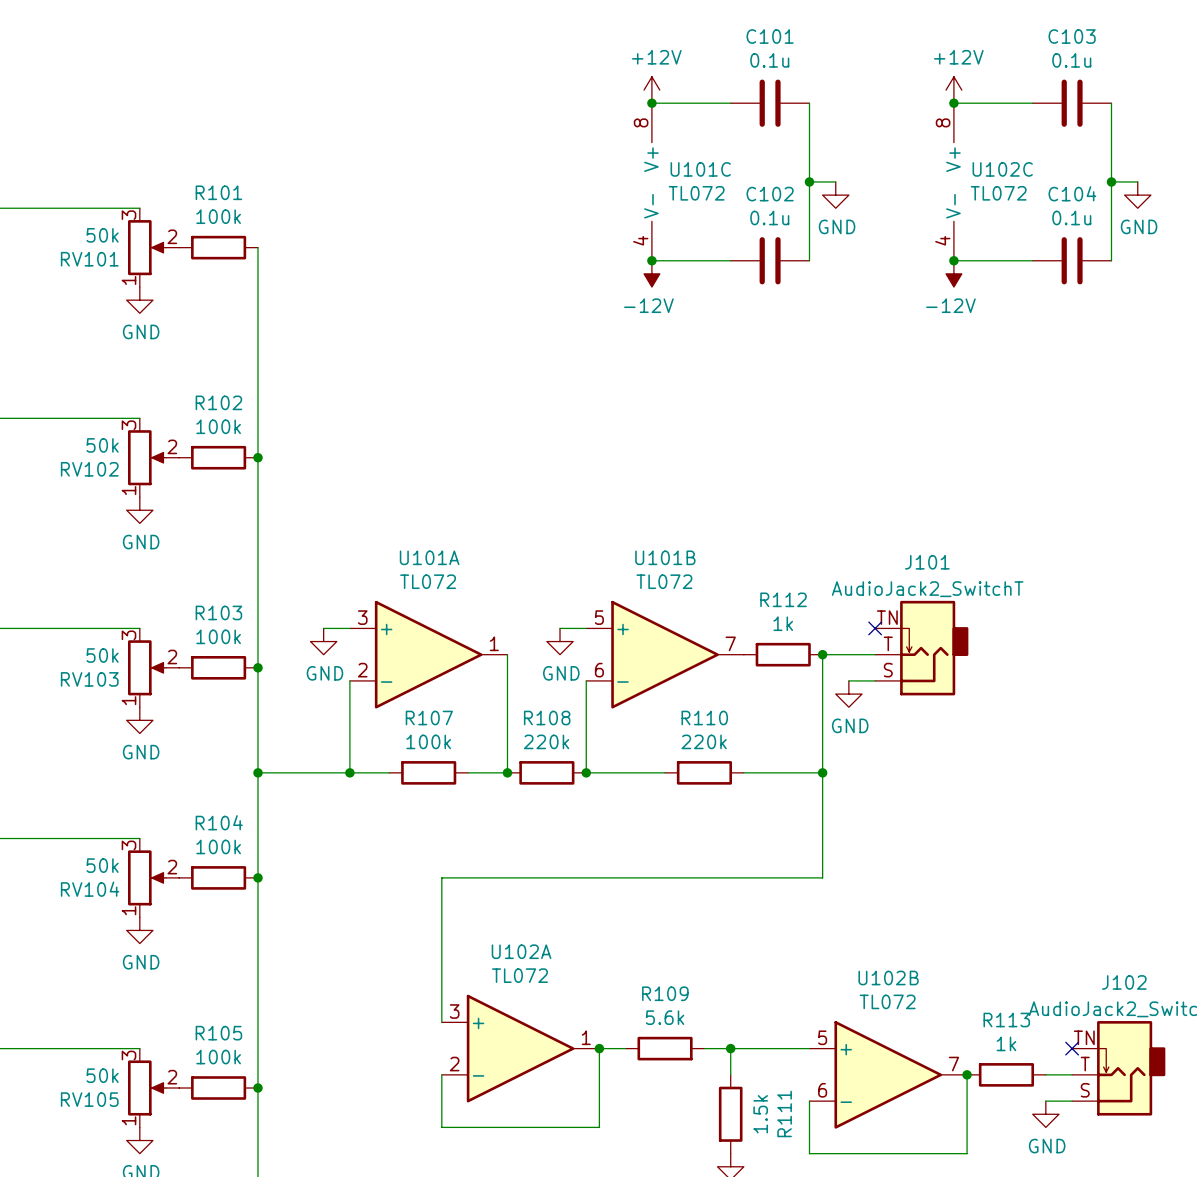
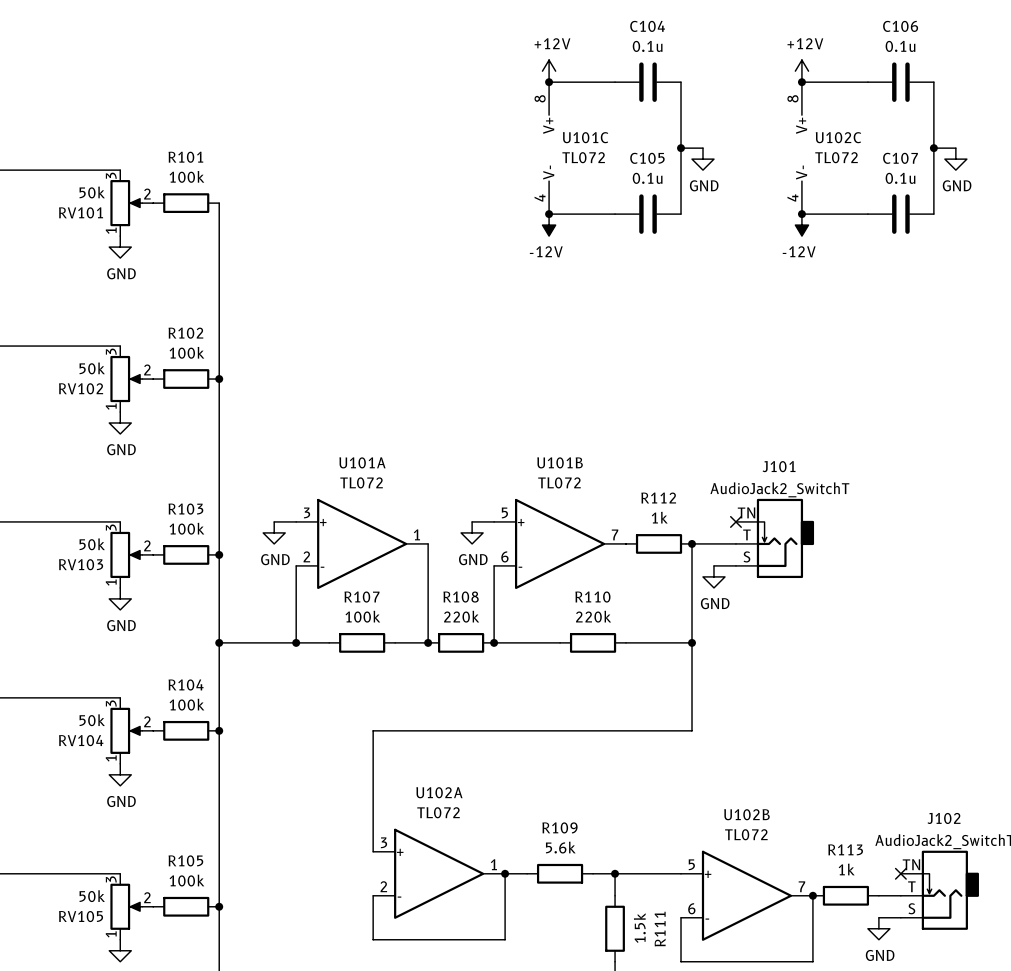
C101 name: C101 (770, 36) -> C104 (647, 26)
C103 name: C103 (1072, 36) -> C106 (900, 26)
C104 name: C104 (1072, 193) -> C107 (900, 158)
C102 name: C102 (770, 194) -> C105 (647, 158)

